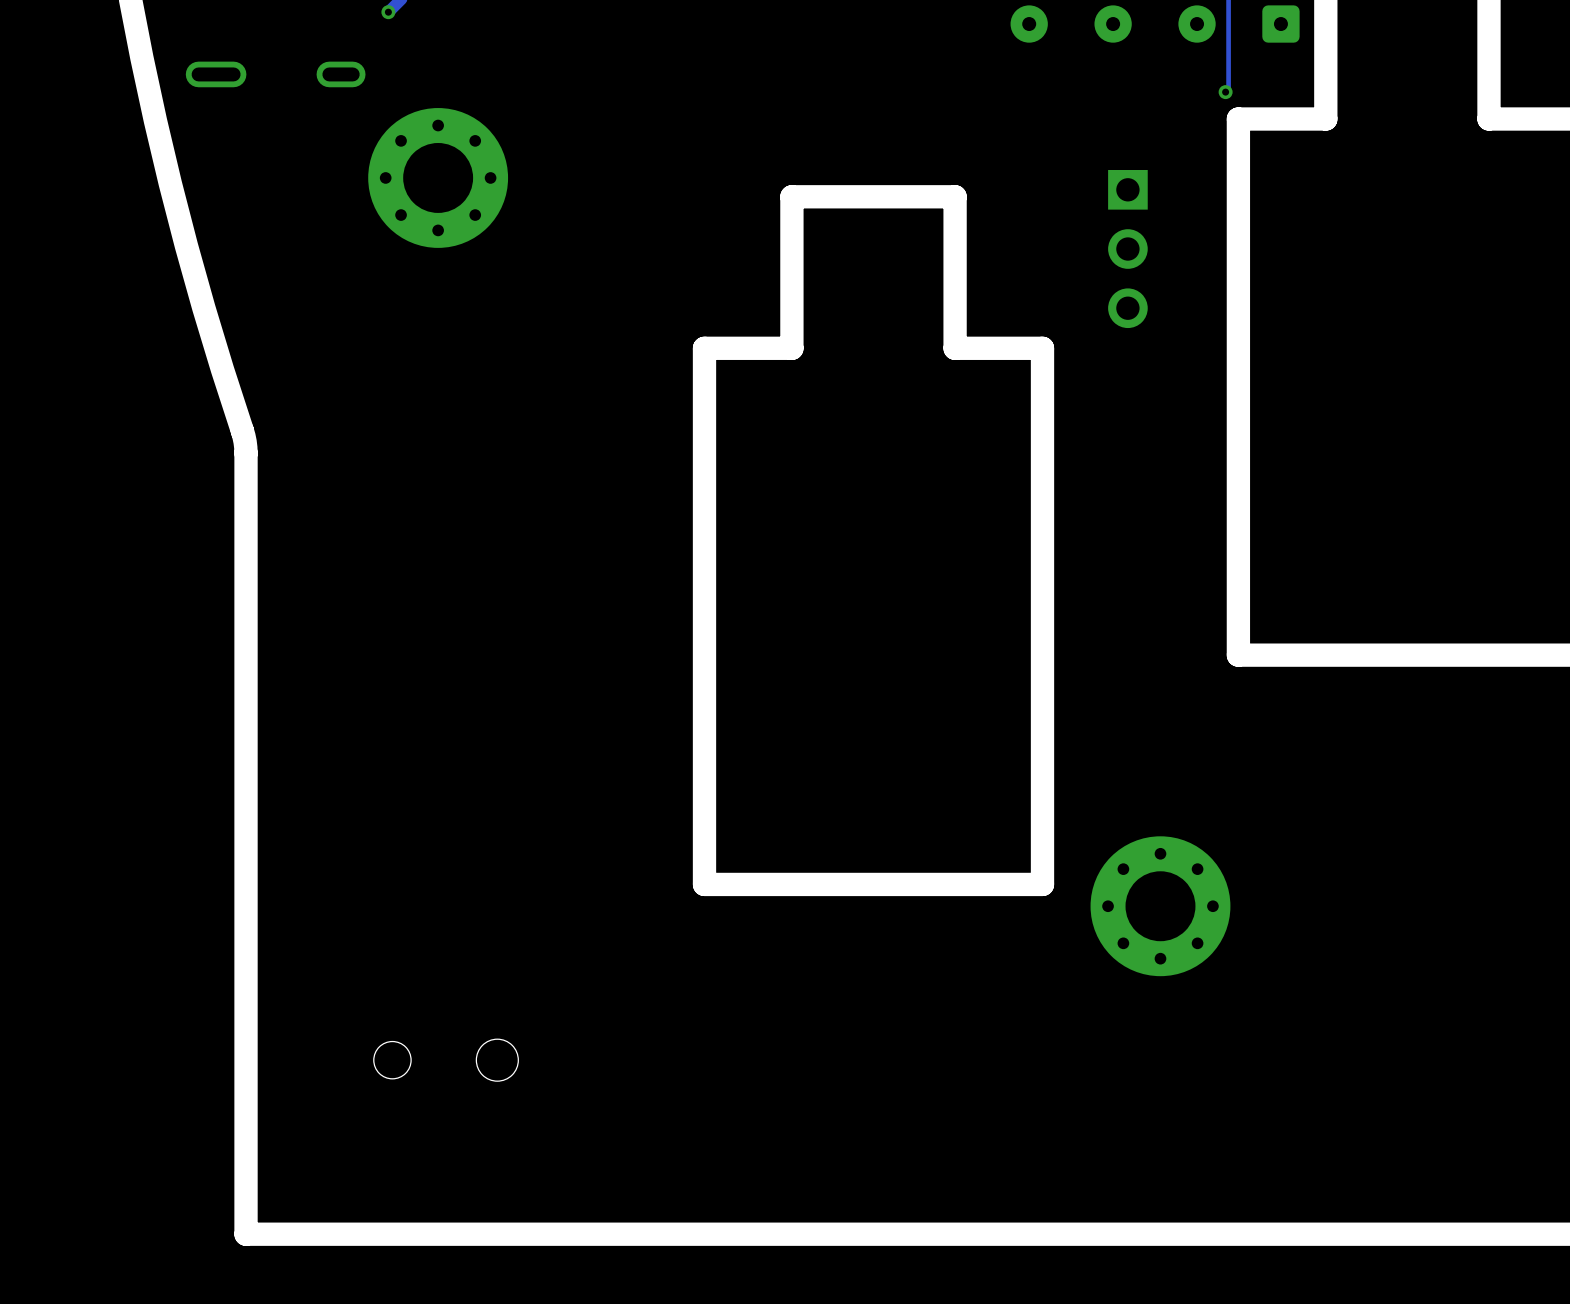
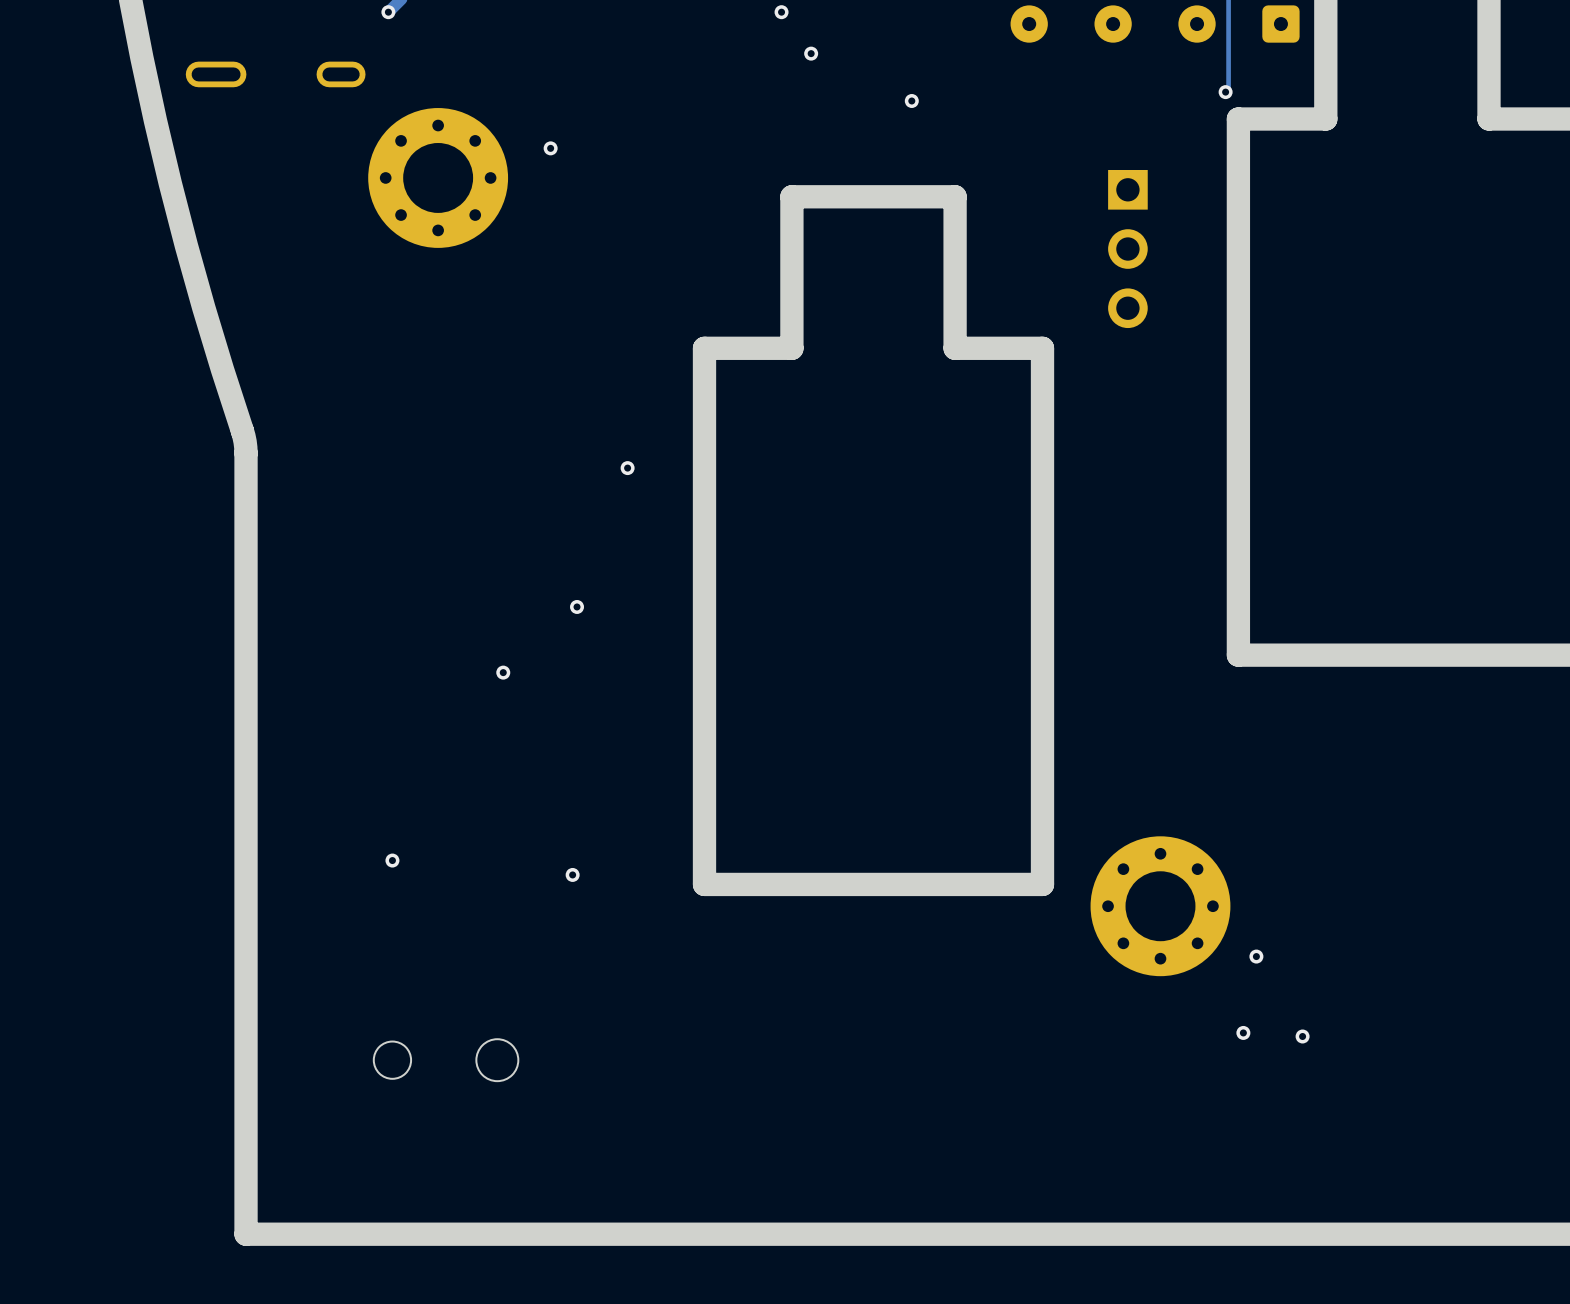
via: none -> (781, 12)
via: none -> (811, 53)
via: none -> (911, 100)
via: none -> (550, 148)
via: none -> (627, 468)
via: none -> (577, 606)
via: none -> (503, 672)
via: none -> (392, 860)
via: none -> (572, 874)
via: none -> (1256, 956)
via: none -> (1243, 1032)
via: none -> (1302, 1036)

